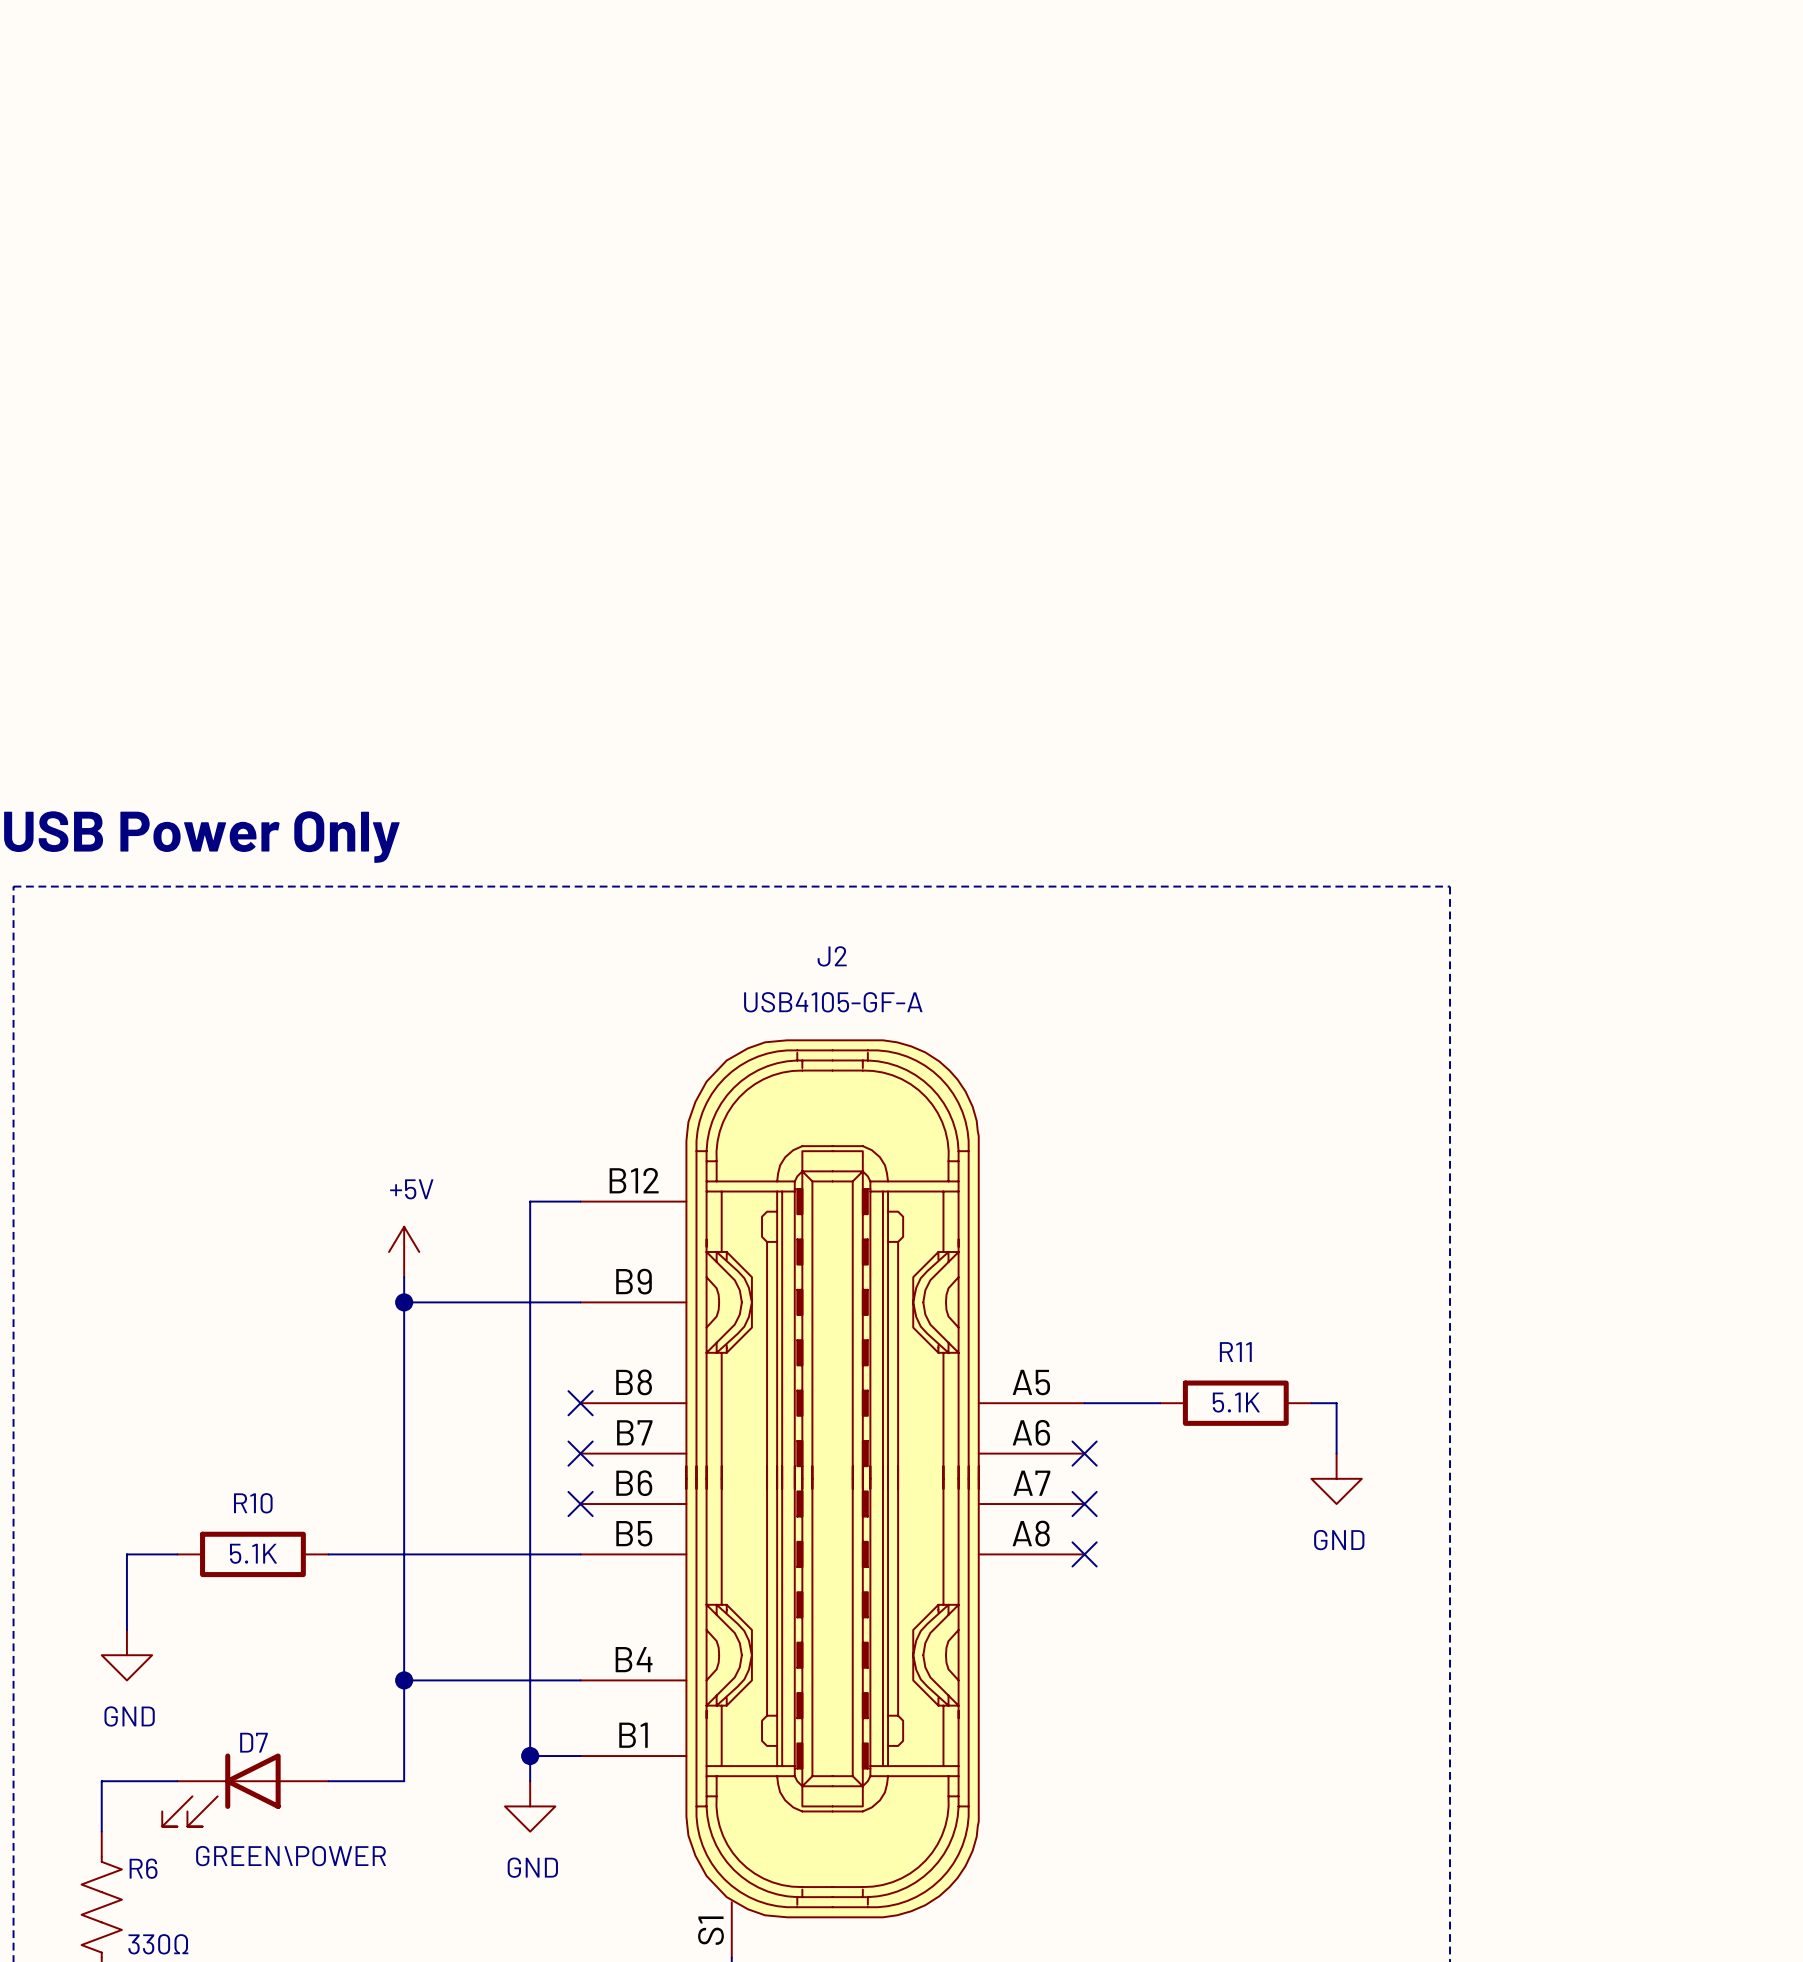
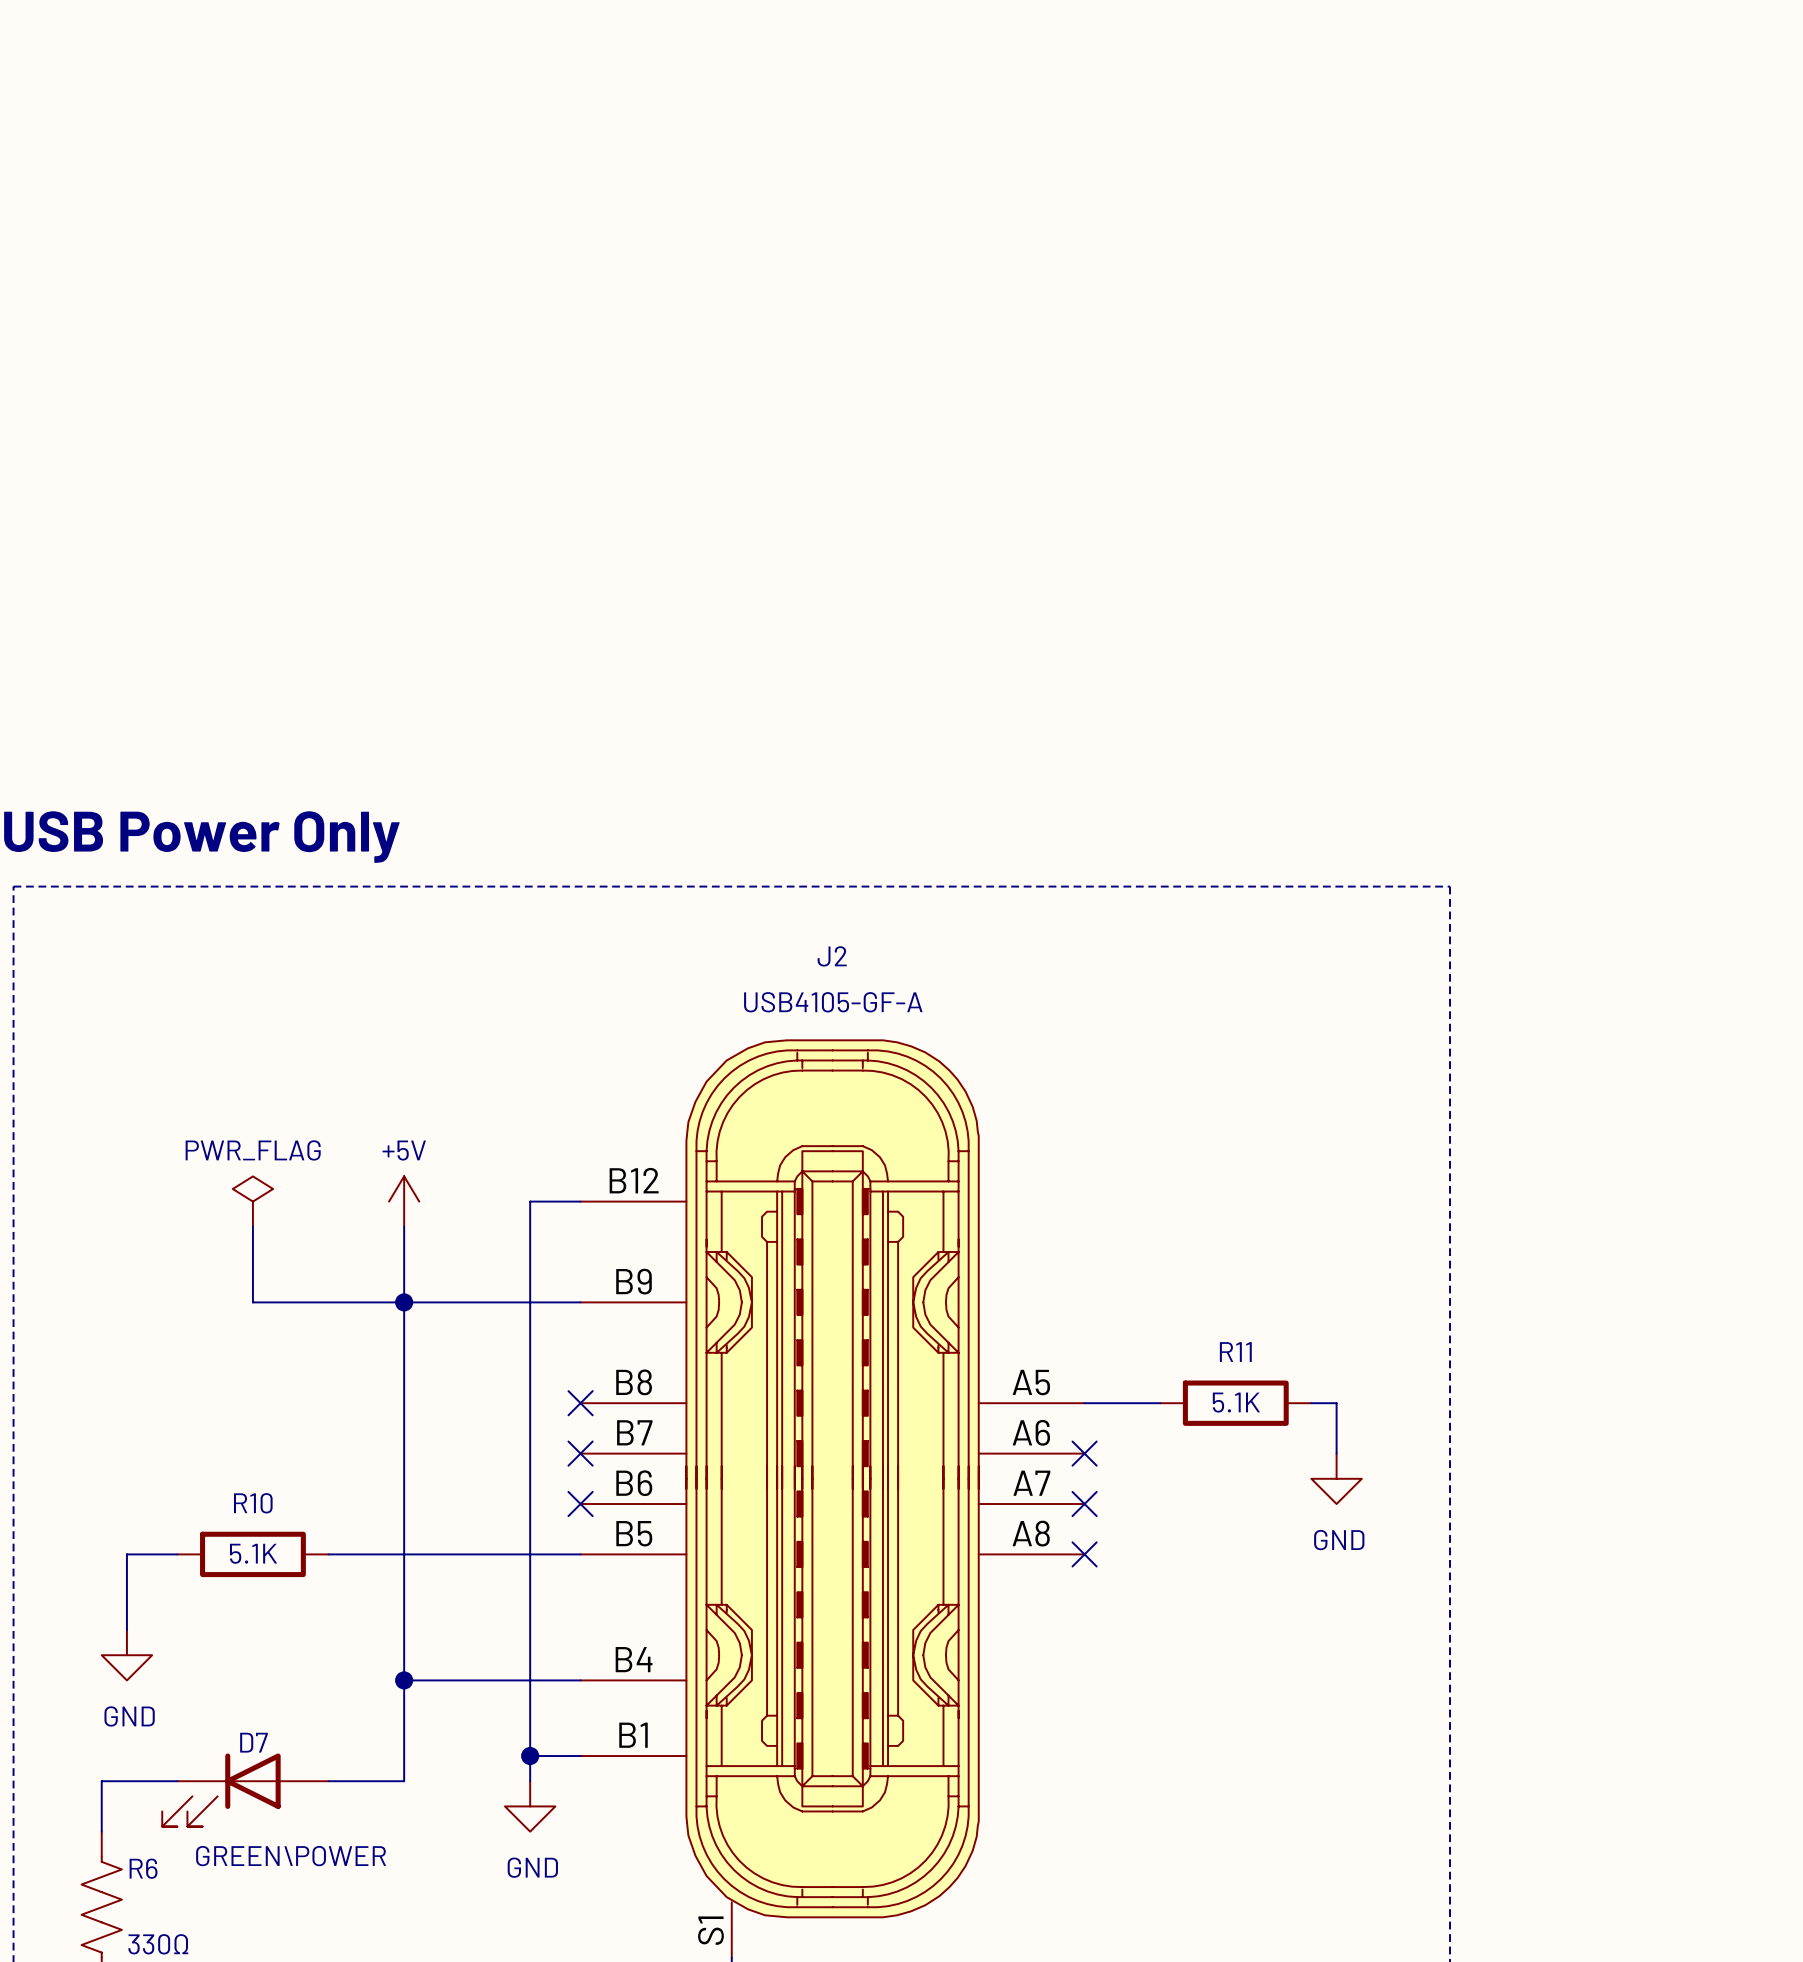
power symbol text position: +5V (411, 1189) -> +5V (404, 1150)
power symbol: none -> PWR_FLAG (252, 1201)
wire: none -> (252, 1226) (252, 1302) (404, 1302)
power symbol position: +5V (404, 1251) -> +5V (404, 1201)

